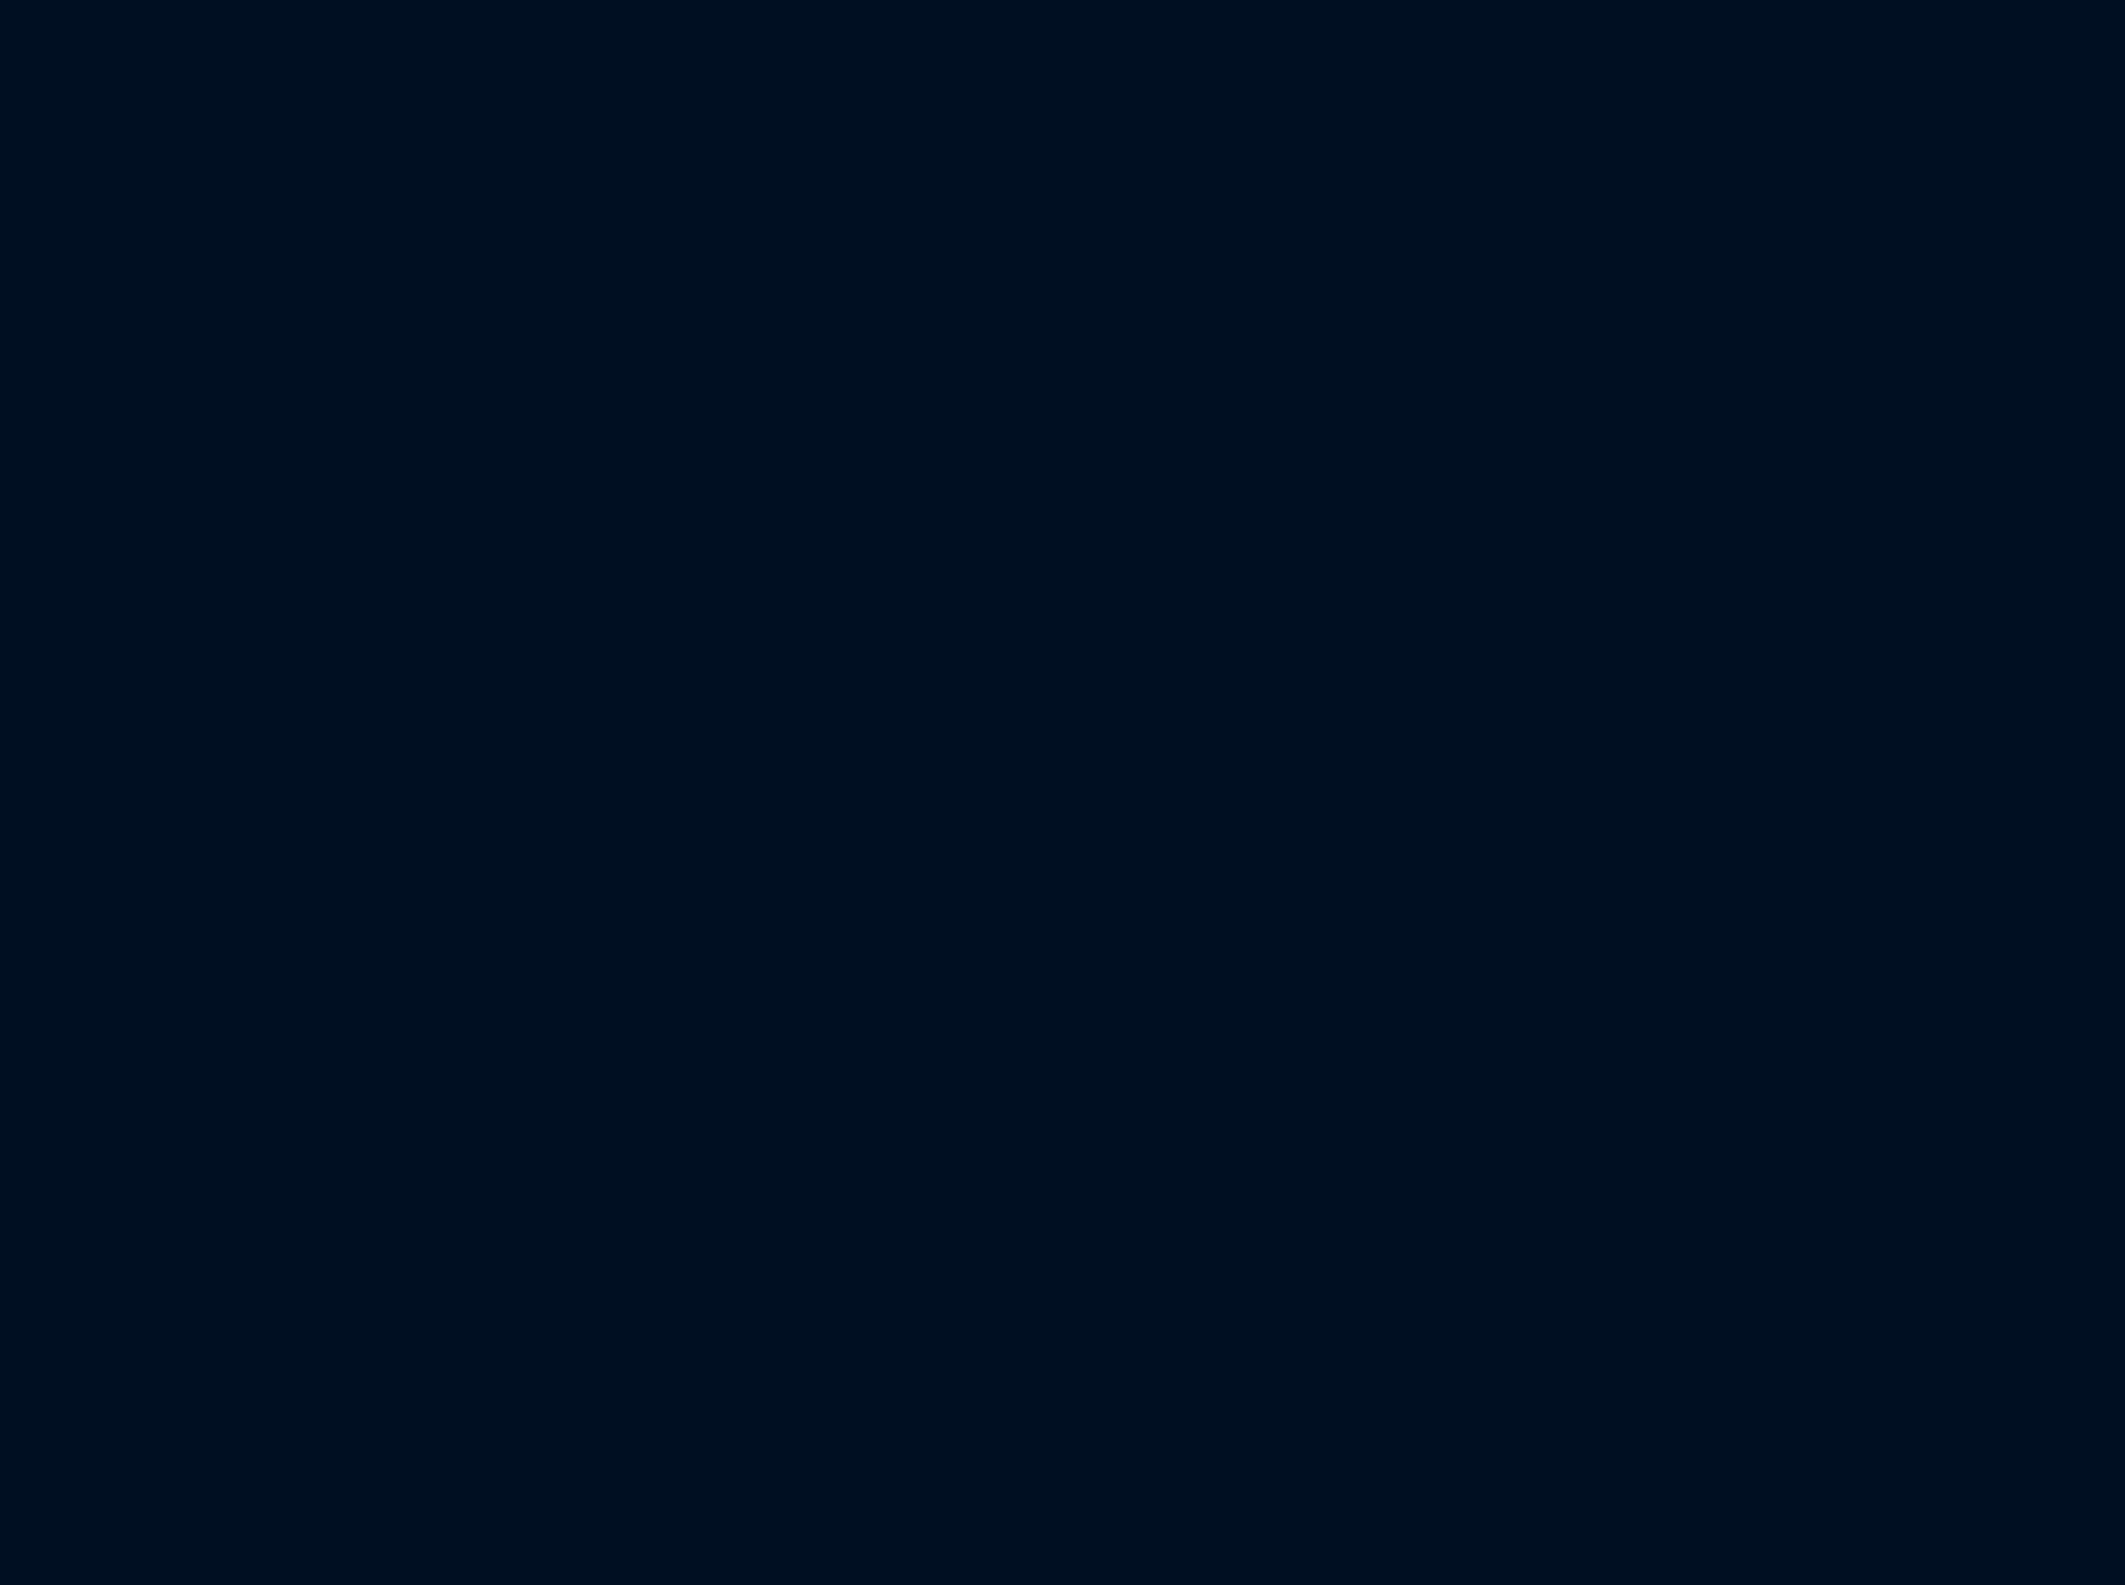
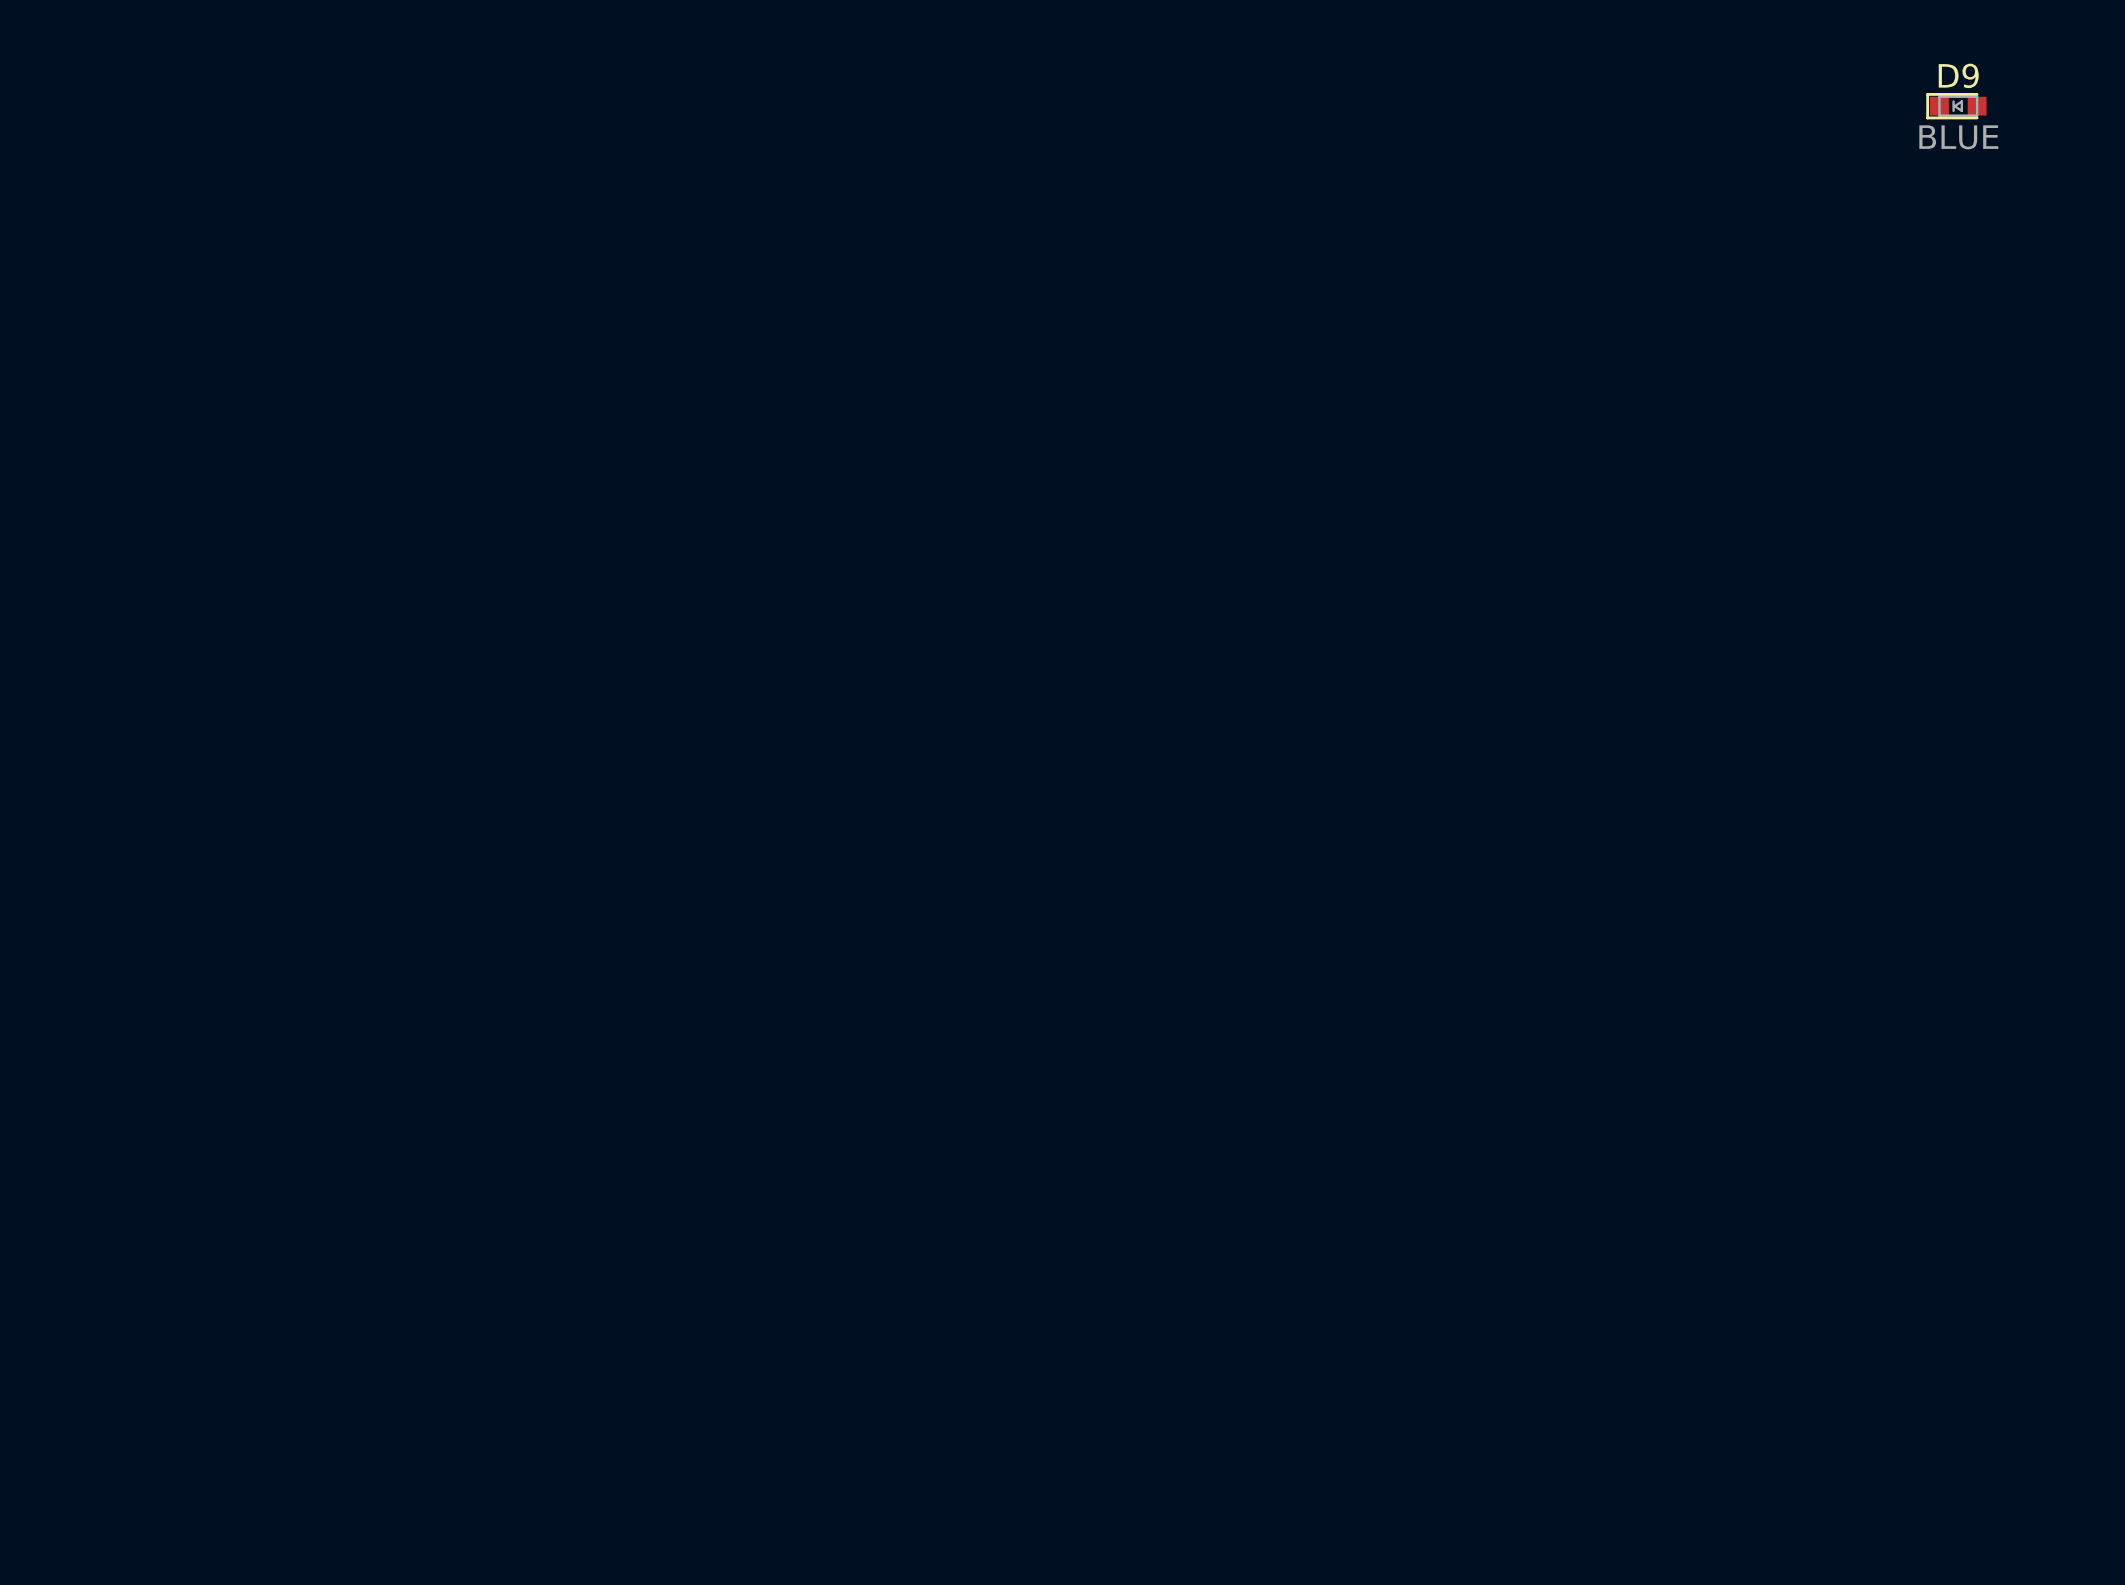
D9: none -> BLUE (1956, 106)

